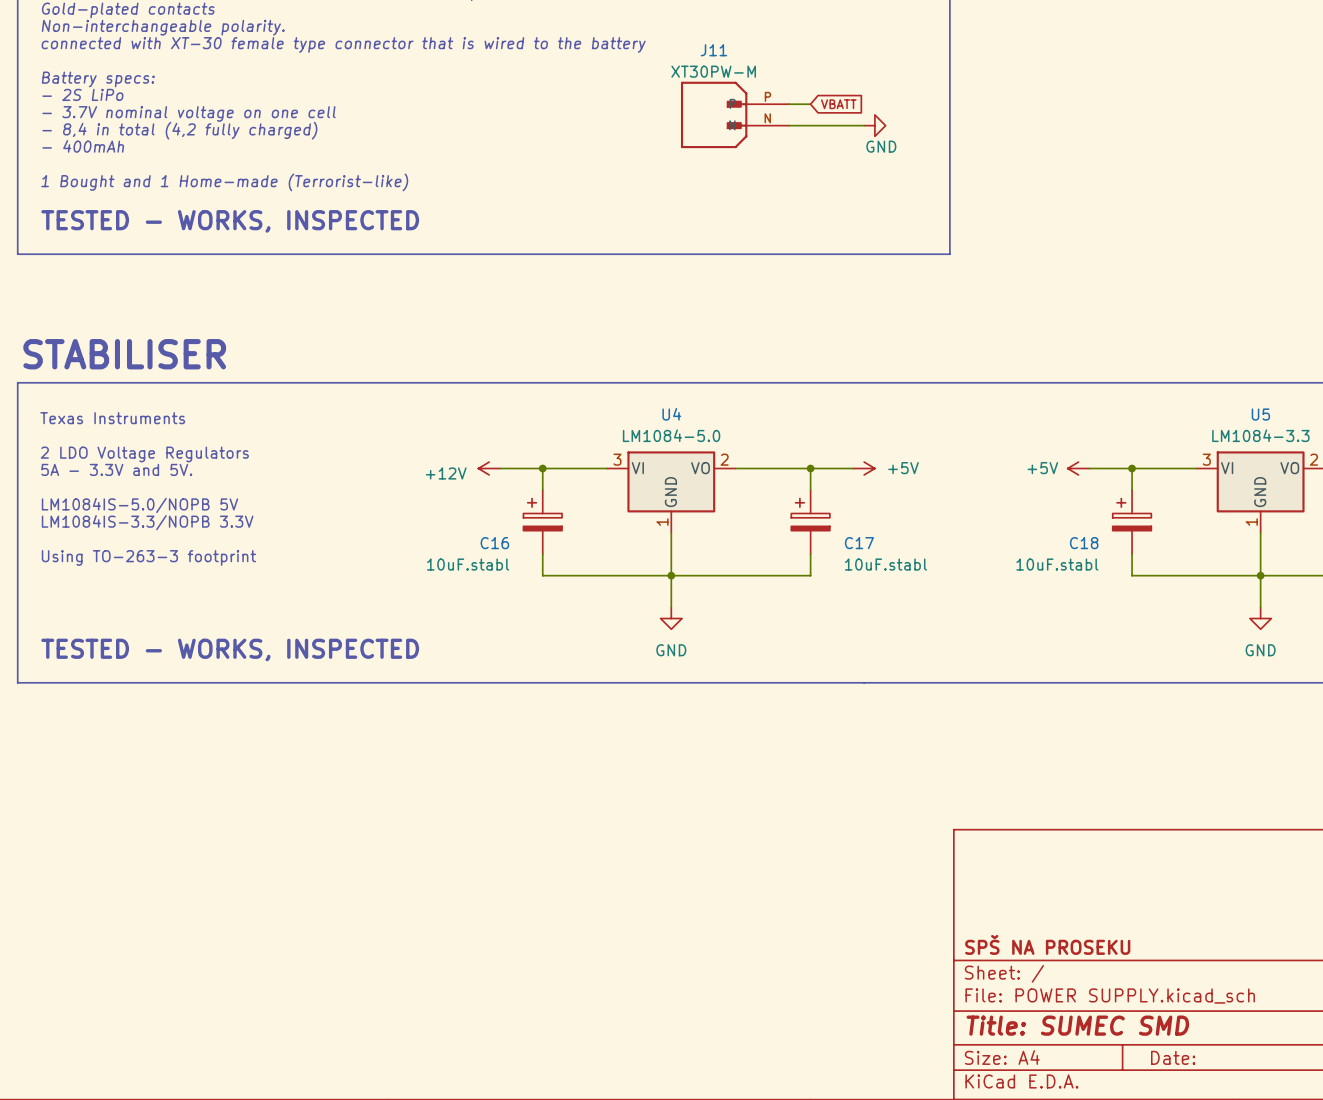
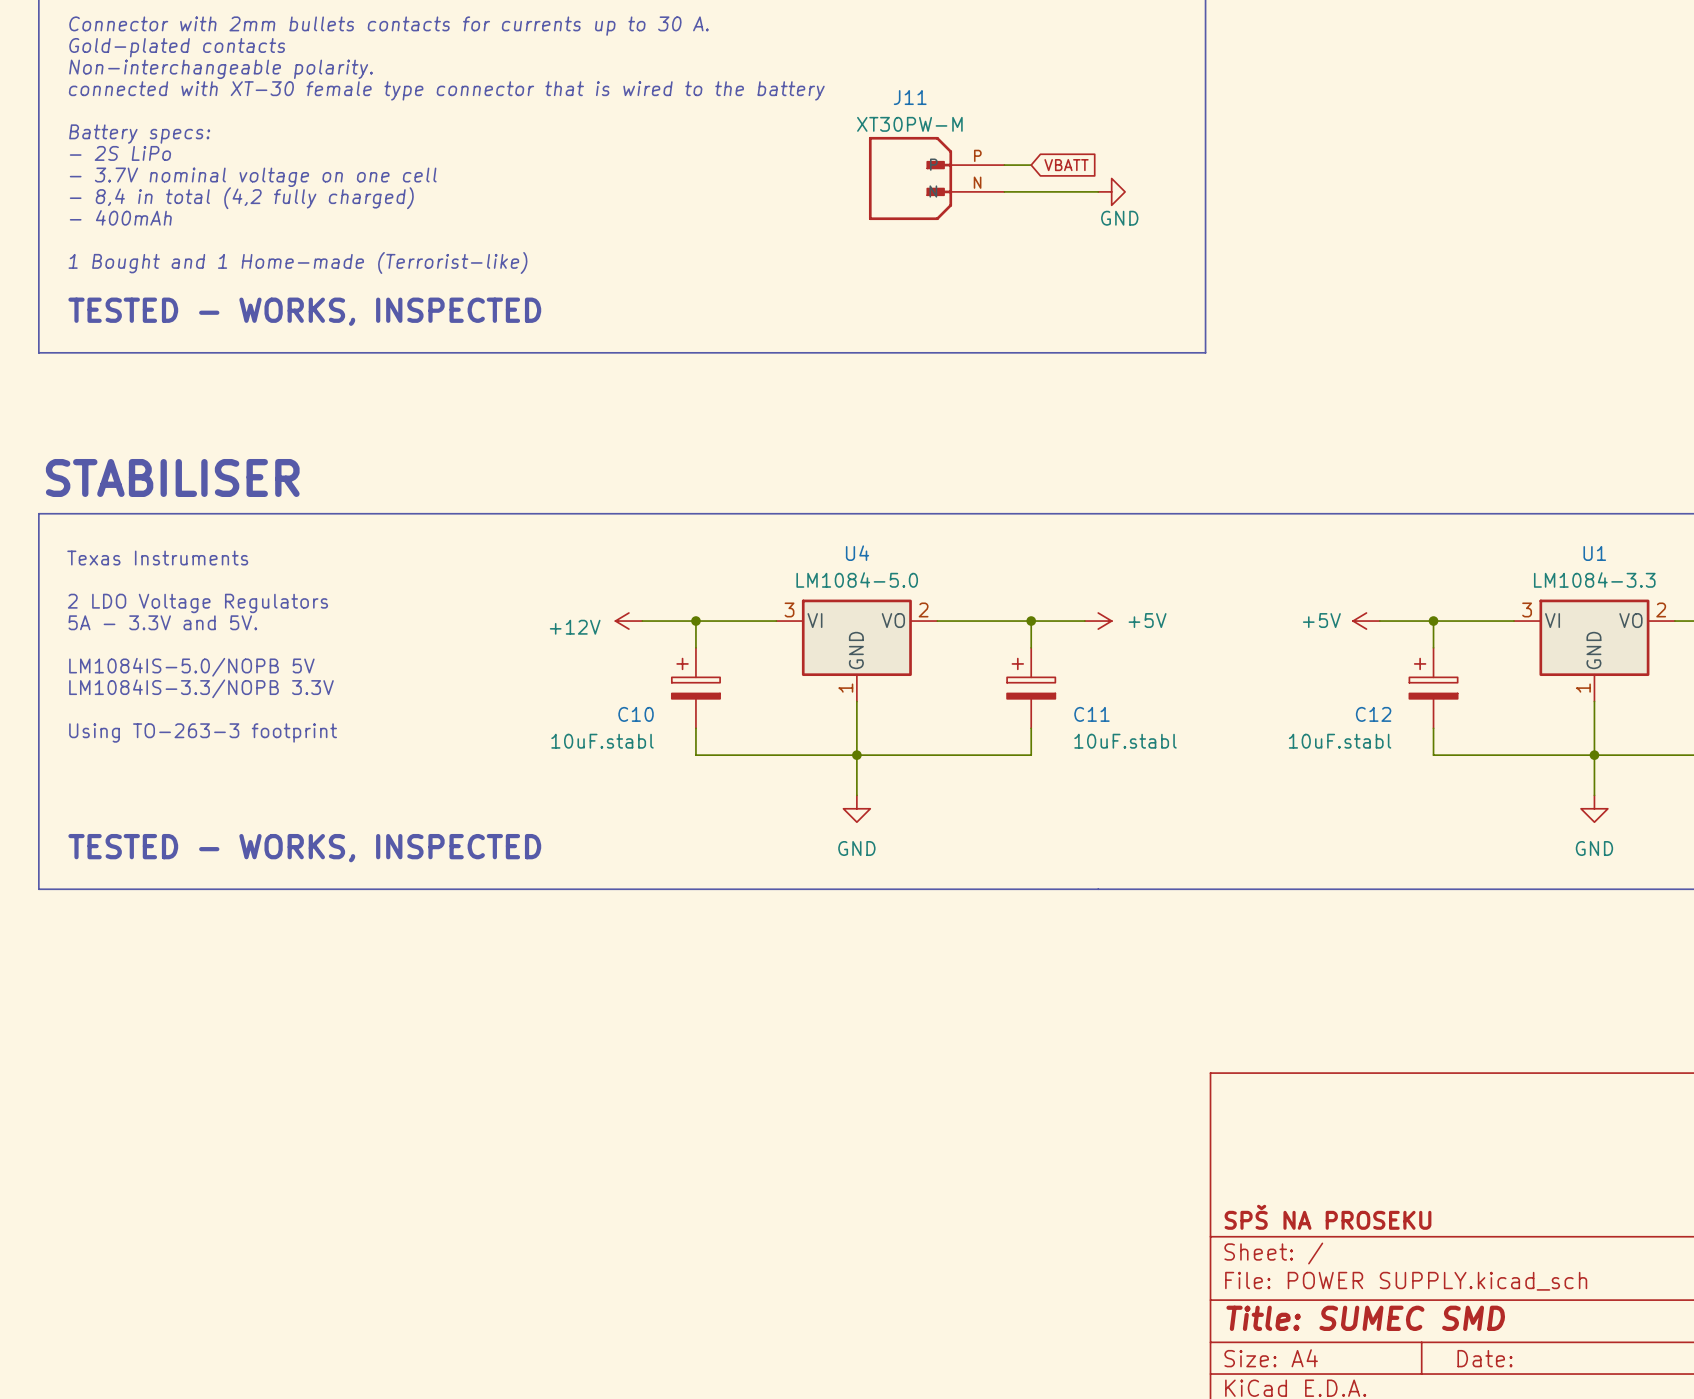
U5 name: U5 (1260, 414) -> U1 (1594, 553)
C16 name: C16 (494, 543) -> C10 (636, 714)
C17 name: C17 (859, 543) -> C11 (1091, 714)
C18 name: C18 (1084, 543) -> C12 (1373, 714)

